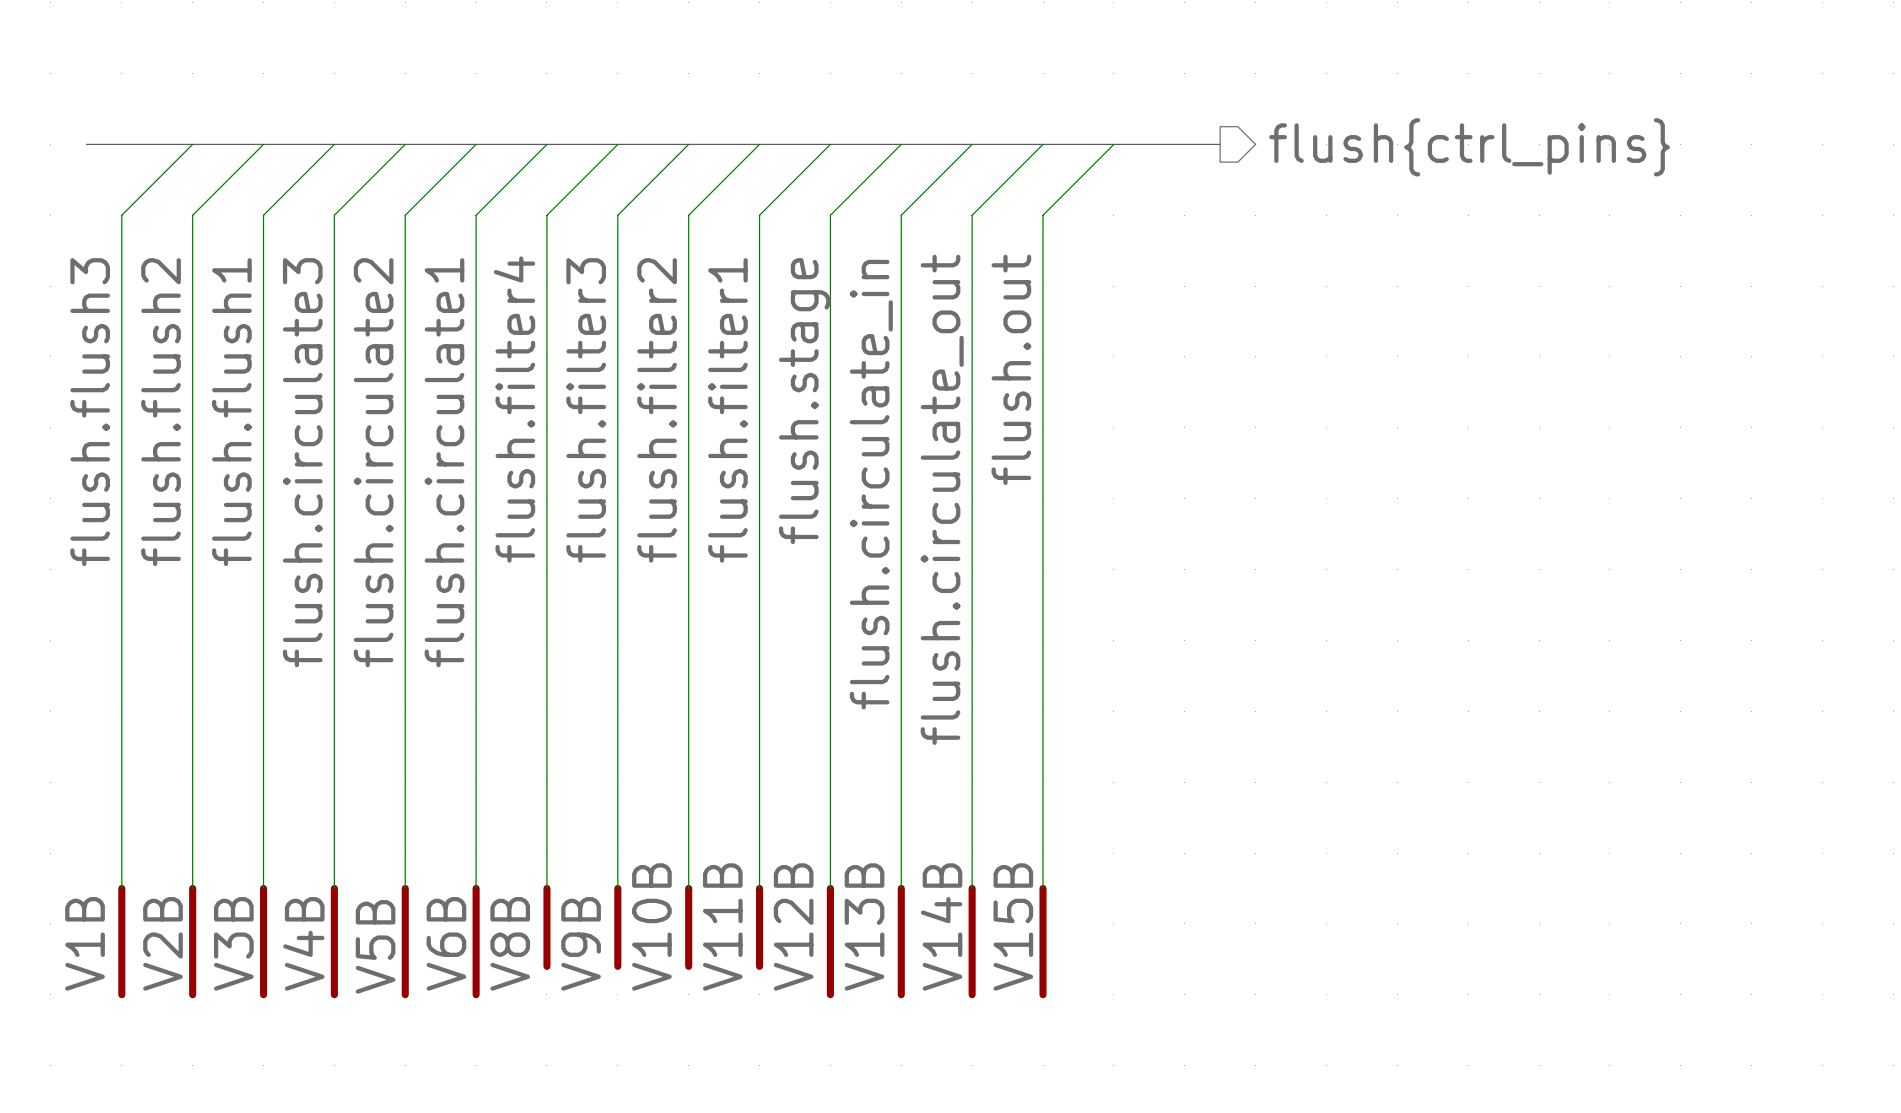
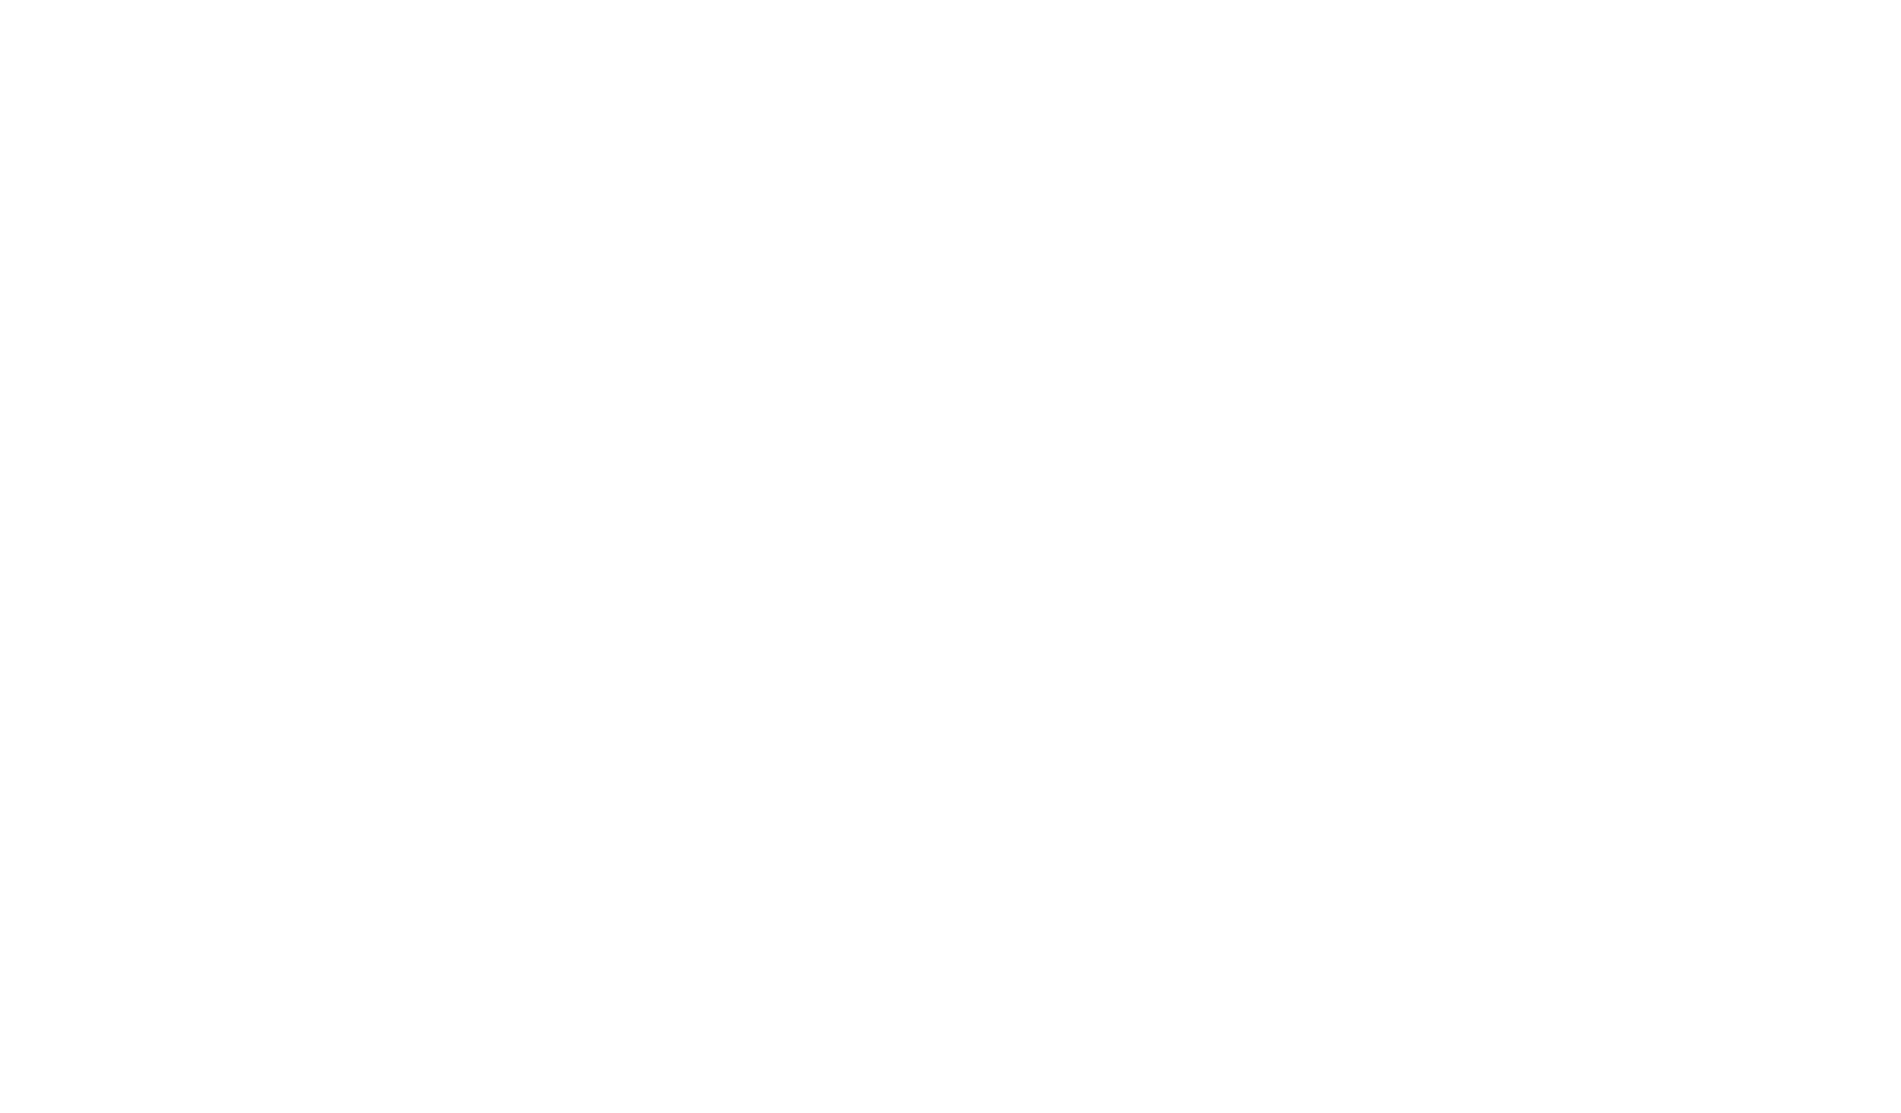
bus: (86, 144) (1220, 144) -> none
wire: (192, 144) (121, 215) (121, 888) -> none
wire: (263, 144) (192, 215) (192, 888) -> none
wire: (334, 144) (263, 215) (263, 888) -> none
wire: (405, 144) (334, 215) (334, 888) -> none
wire: (476, 144) (405, 215) (405, 888) -> none
wire: (546, 144) (476, 215) (476, 888) -> none
wire: (617, 144) (546, 215) (546, 888) -> none
wire: (688, 144) (617, 215) (617, 888) -> none
wire: (759, 144) (688, 215) (688, 888) -> none
wire: (830, 144) (759, 215) (759, 888) -> none
wire: (901, 144) (830, 215) (830, 888) -> none
wire: (972, 144) (901, 215) (901, 888) -> none
wire: (1043, 144) (972, 215) (972, 888) -> none
wire: (1113, 144) (1043, 215) (1043, 888) -> none
hierarchical label: flush{ctrl_pins} (1469, 147) -> none
label: flush.out (1011, 369) -> none
label: flush.stage (804, 401) -> none
label: flush.filter4 (514, 409) -> none
label: flush.filter3 (586, 410) -> none
label: flush.filter2 (657, 410) -> none
label: flush.filter1 (727, 410) -> none
label: flush.flush3 (90, 412) -> none
label: flush.flush2 (161, 412) -> none
label: flush.flush1 (231, 412) -> none
label: flush.circulate3 (302, 462) -> none
label: flush.circulate2 (373, 462) -> none
label: flush.circulate1 (444, 462) -> none
label: flush.circulate_in (871, 484) -> none
label: flush.circulate_out (942, 499) -> none
V8B: (546, 927) -> none
V9B: (617, 927) -> none
V10B: (688, 927) -> none
V11B: (759, 927) -> none
V1B: (121, 941) -> none
V2B: (192, 941) -> none
V3B: (263, 941) -> none
V4B: (334, 941) -> none
V5B: (405, 941) -> none
V6B: (476, 941) -> none
V12B: (830, 941) -> none
V13B: (901, 941) -> none
V14B: (972, 941) -> none
V15B: (1043, 941) -> none

